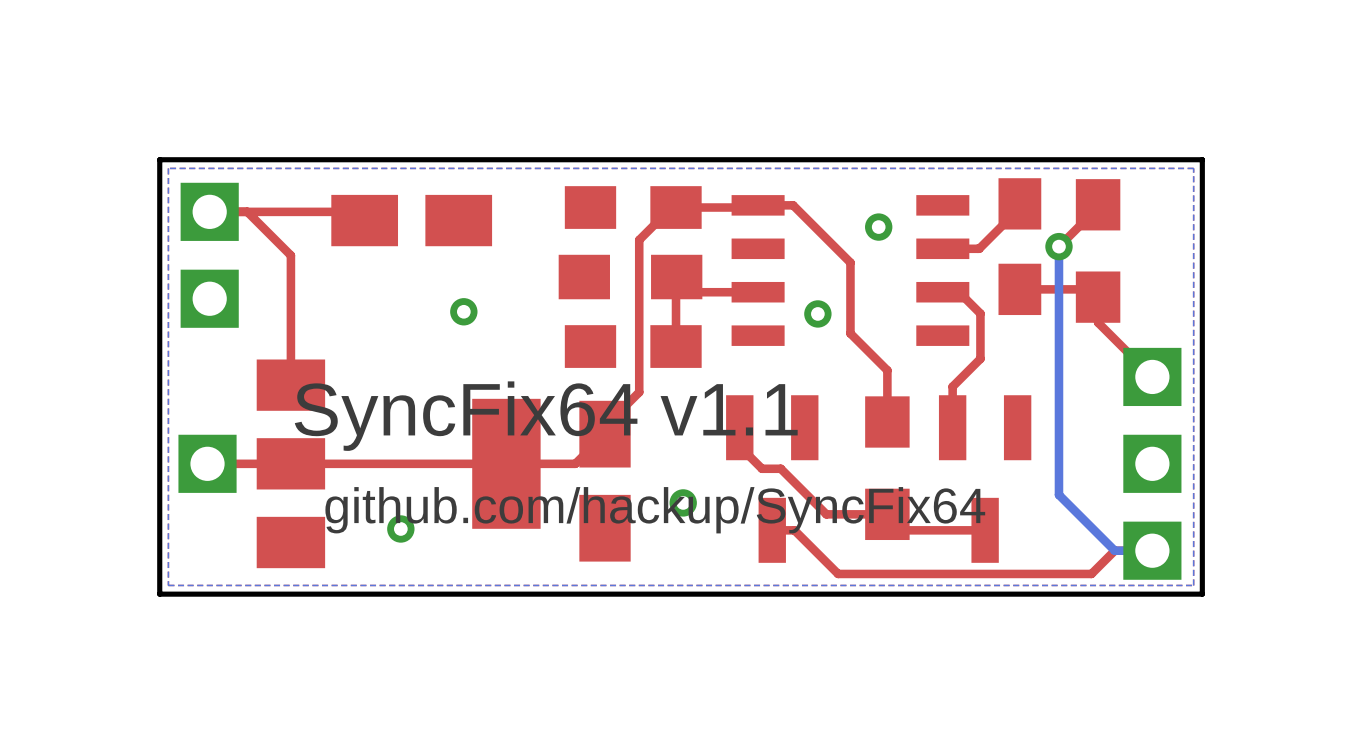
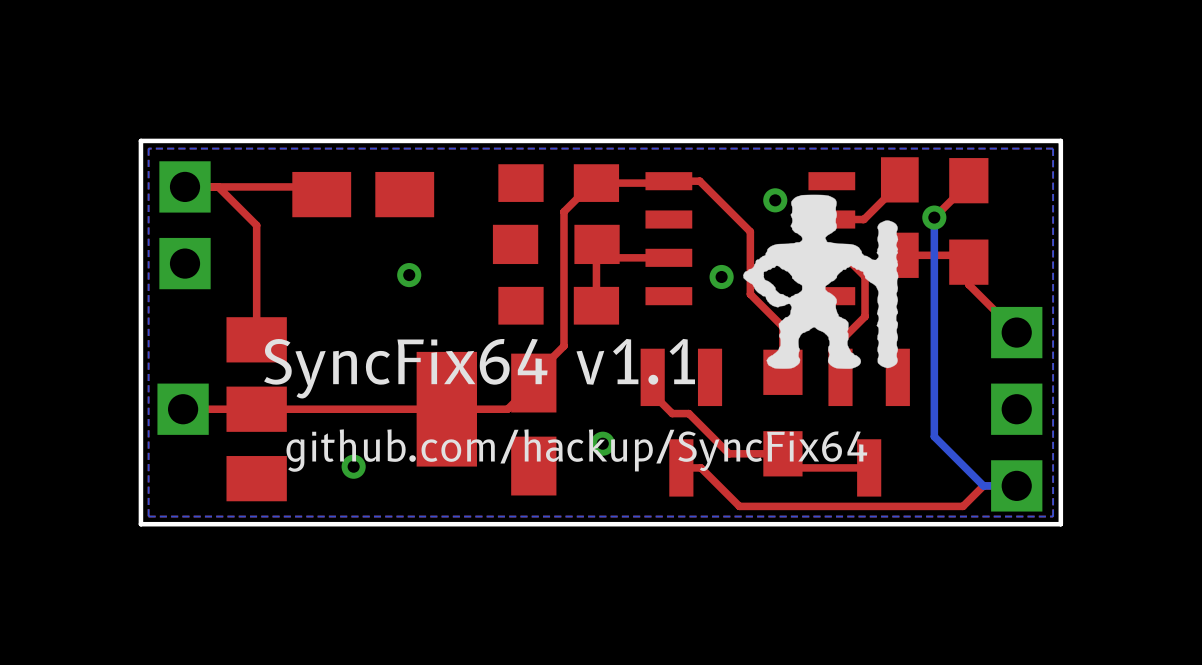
drawing: none -> [743, 194, 899, 369]

